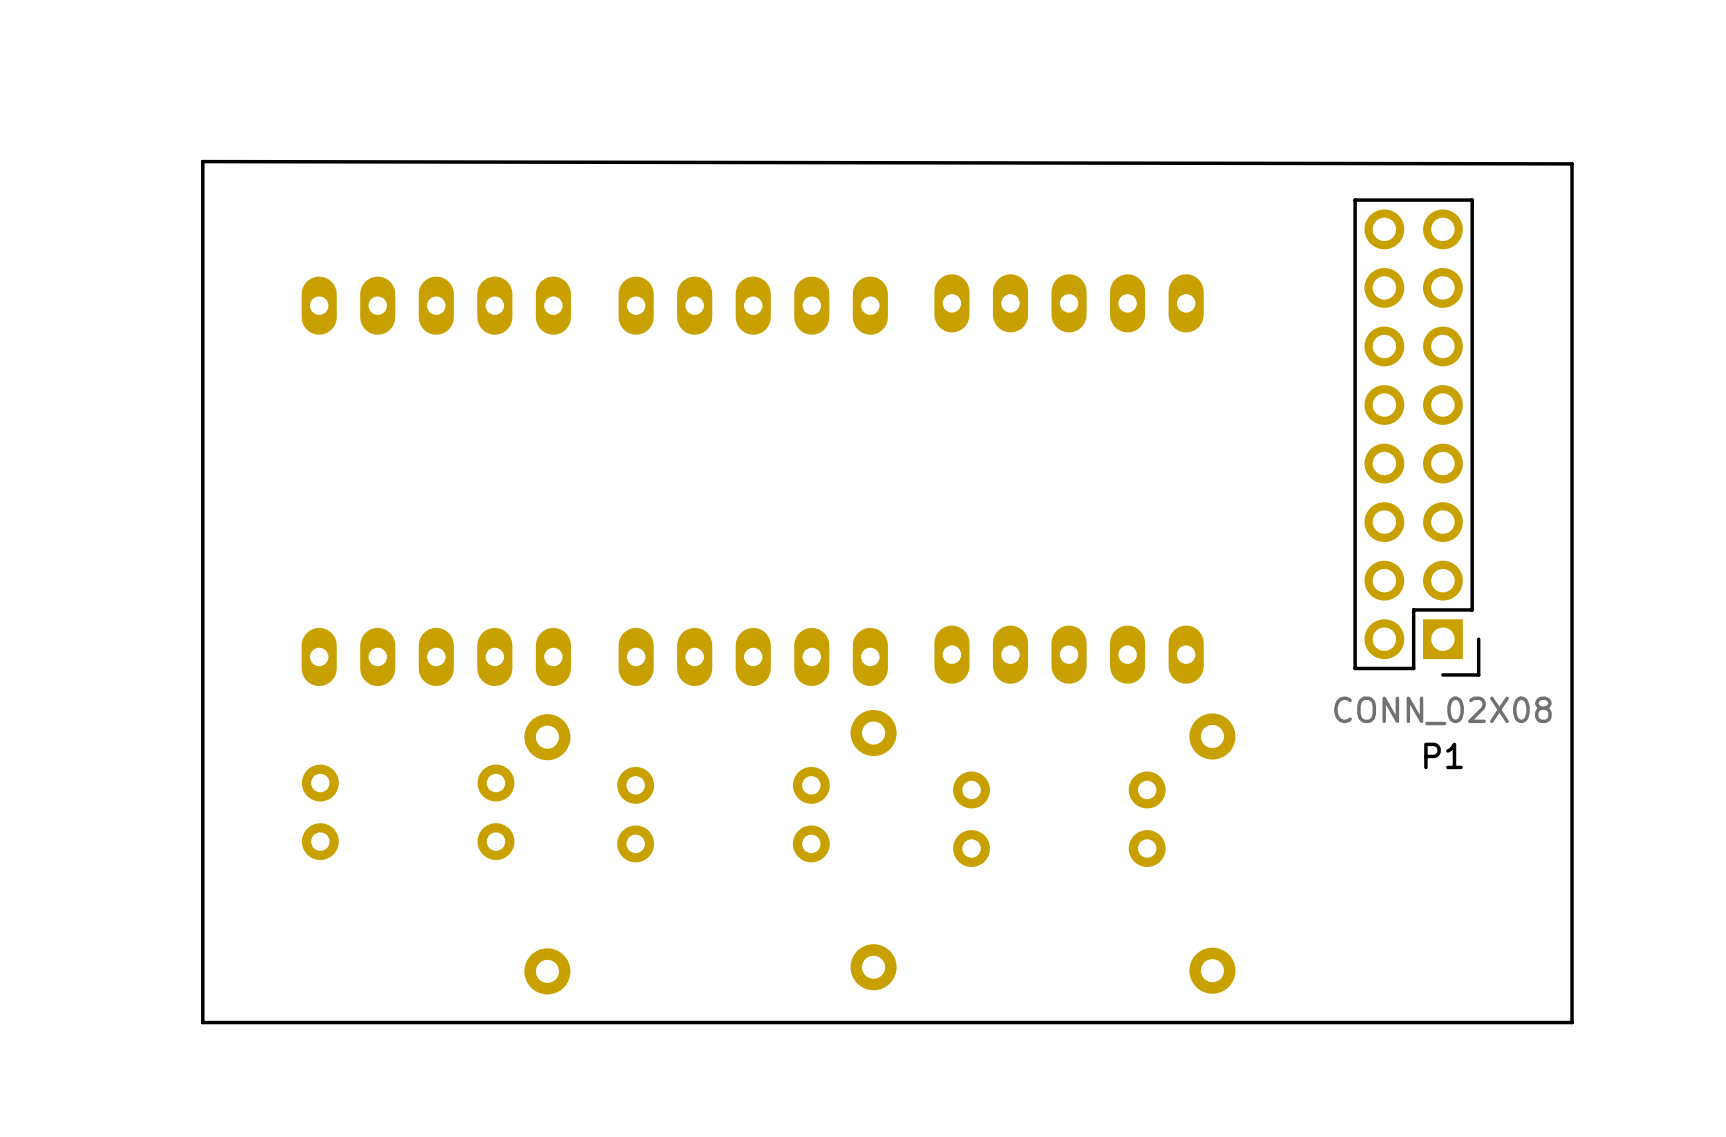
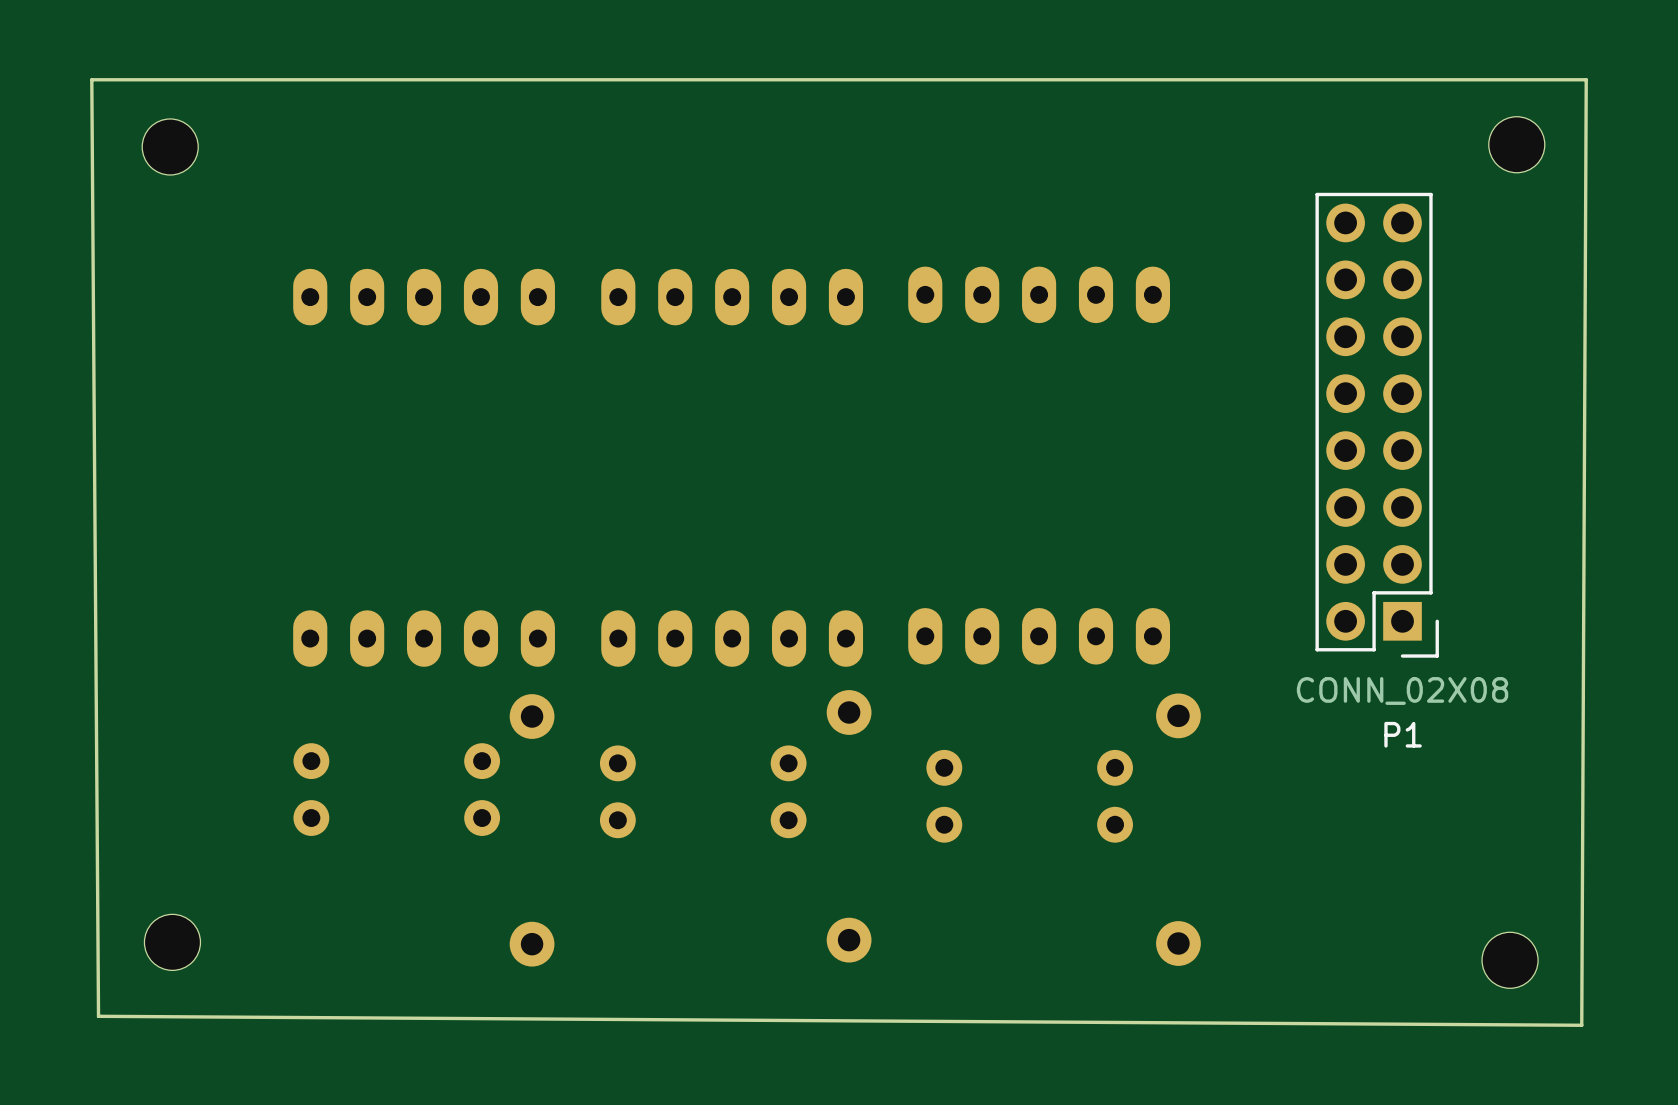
part: none -> (1516, 144)
part: none -> (170, 146)
board edge: (202, 161) (202, 1022) (1572, 1022) (1572, 163) (202, 161) -> (1586, 79) (1581, 1025) (98, 1016) (91, 79) (1586, 79)
part: none -> (172, 942)
part: none -> (1510, 960)

